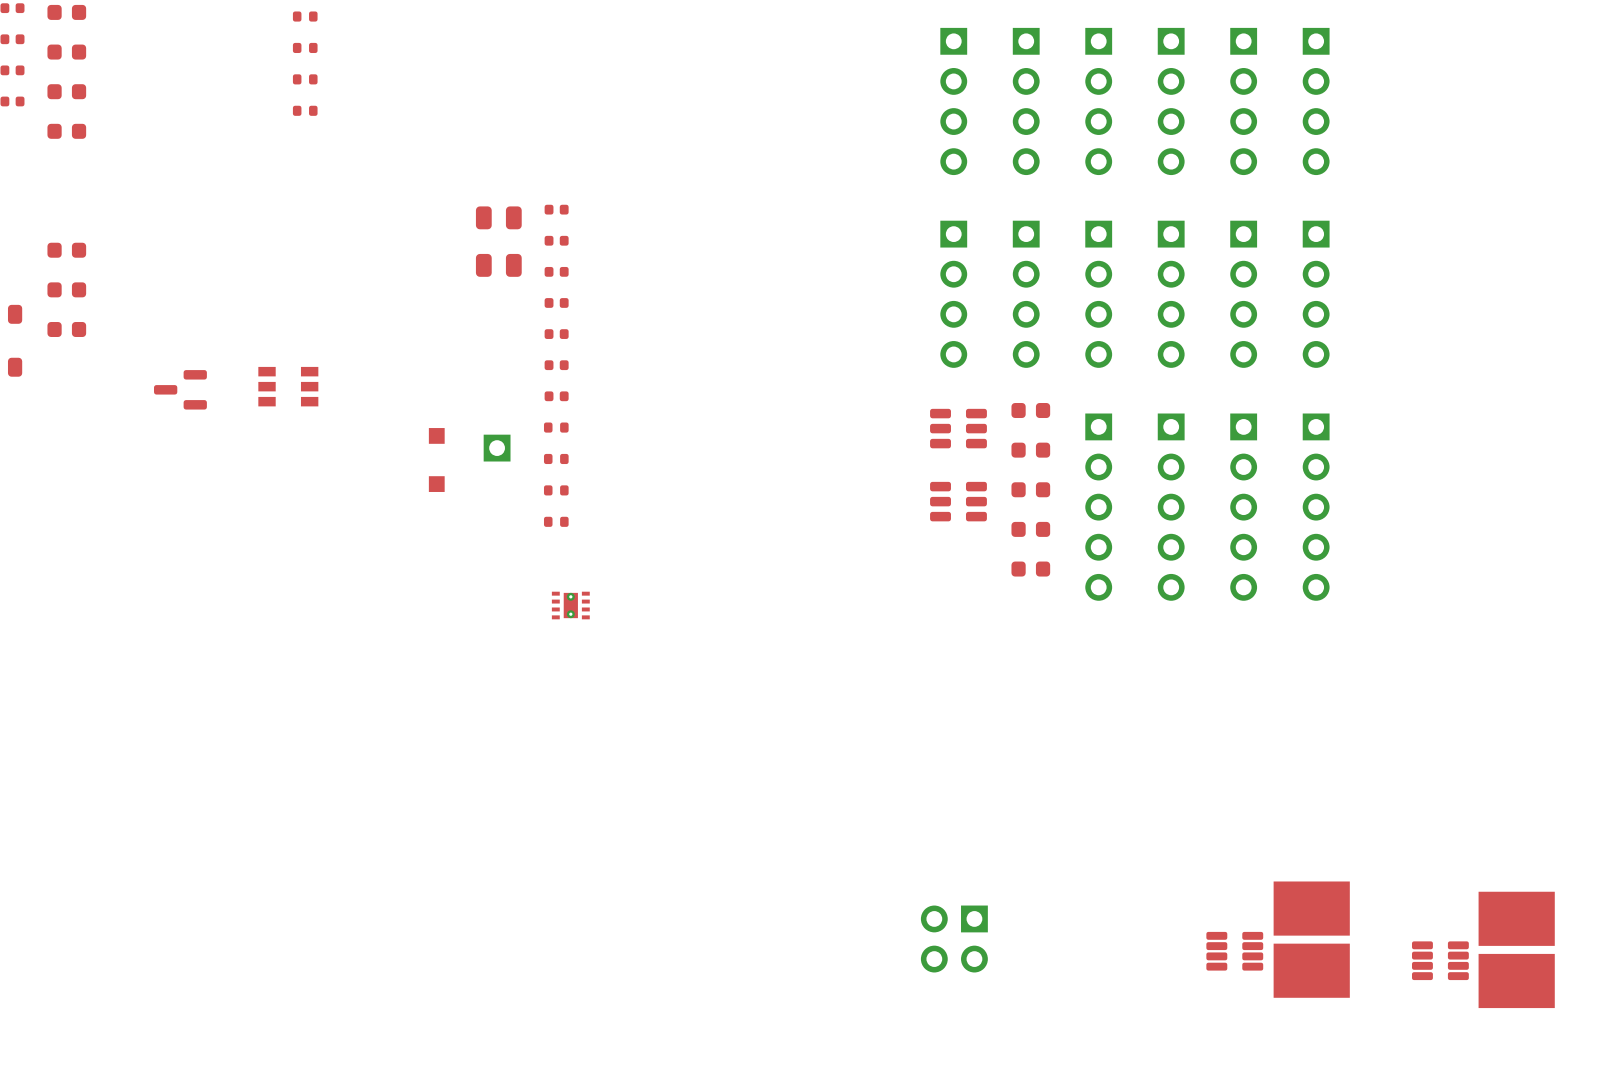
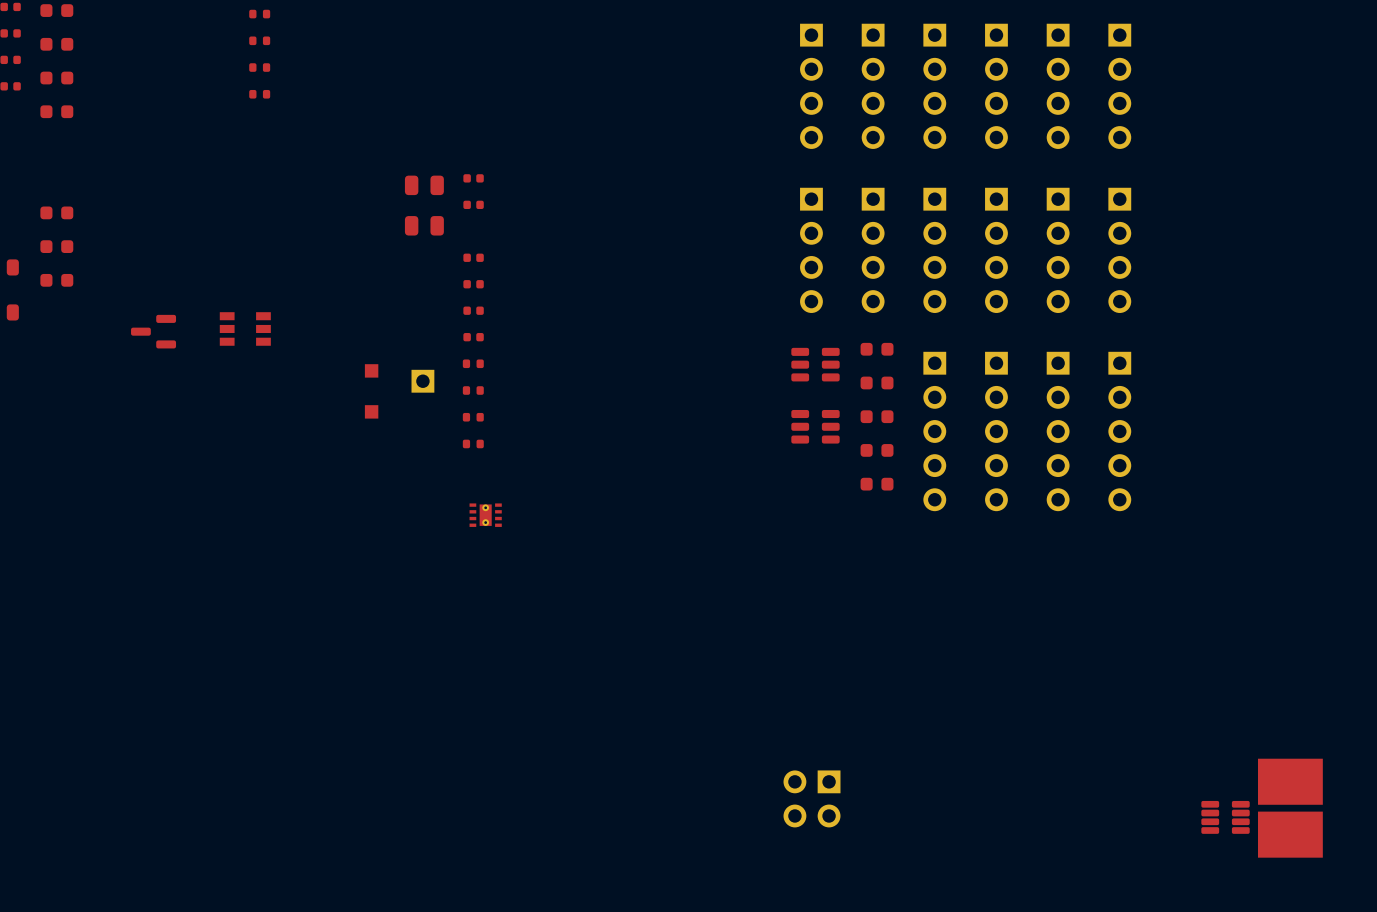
part: (556, 271) -> none
part: (1311, 939) -> none
part: (1234, 951) -> none

